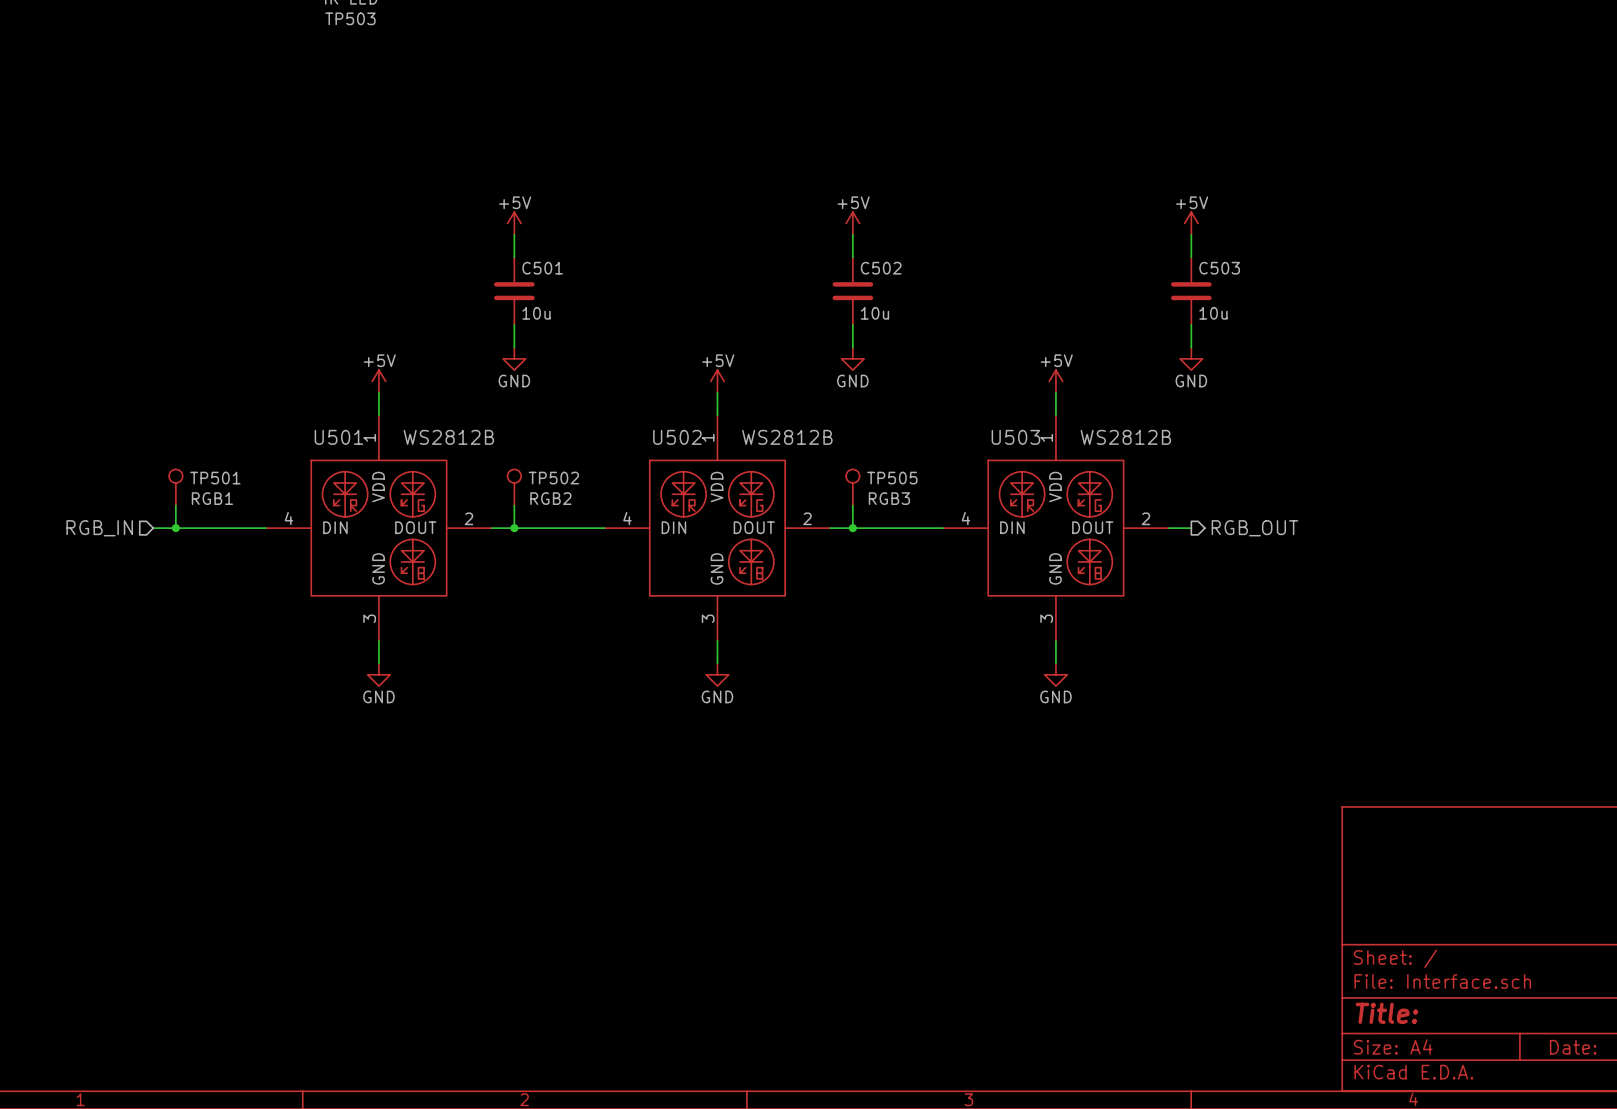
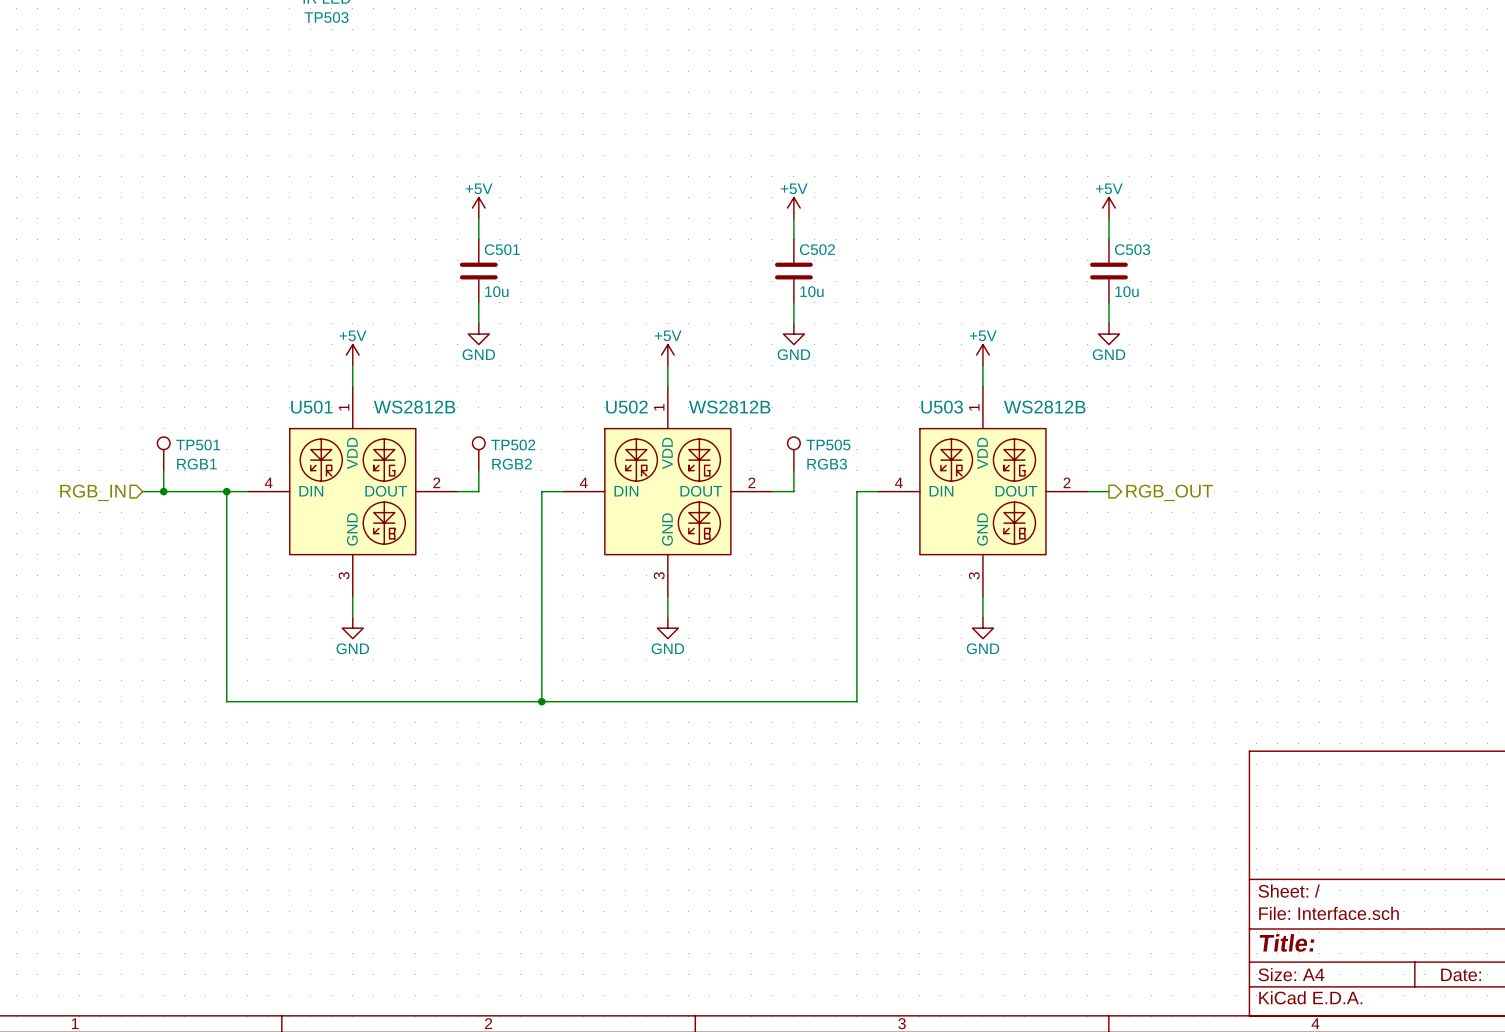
junction: none -> (226, 491)
wire: (514, 528) (582, 528) -> (541, 701) (541, 491)
junction: (514, 528) -> none
wire: (852, 528) (920, 528) -> (226, 491) (226, 701) (856, 701) (856, 491)
junction: (852, 528) -> none
junction: none -> (541, 701)

